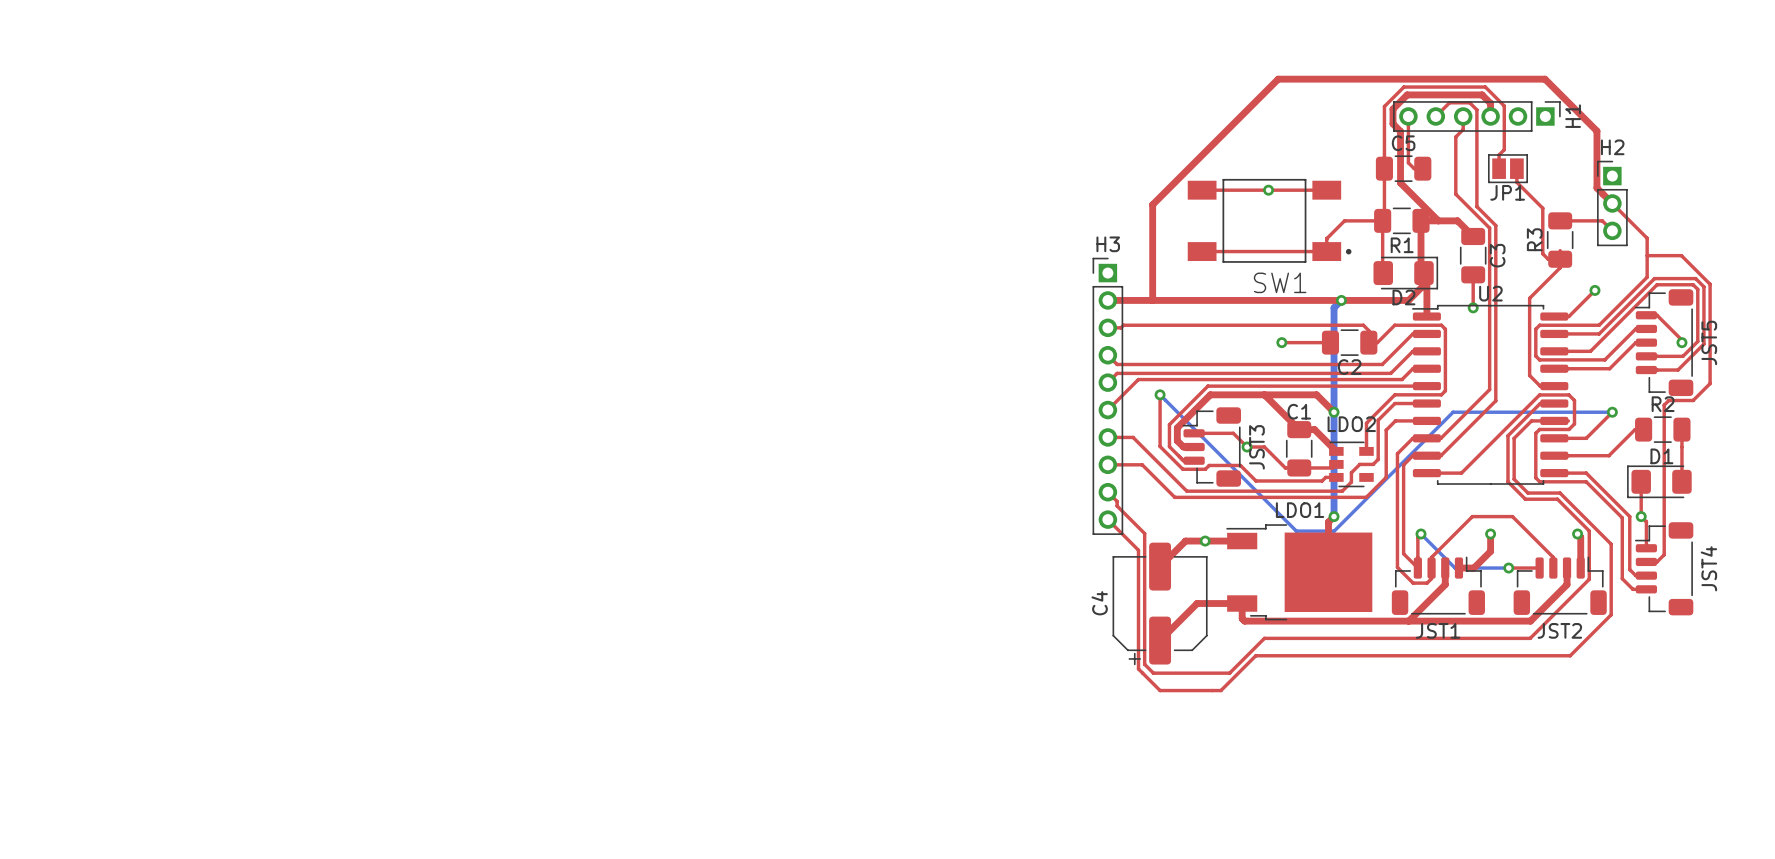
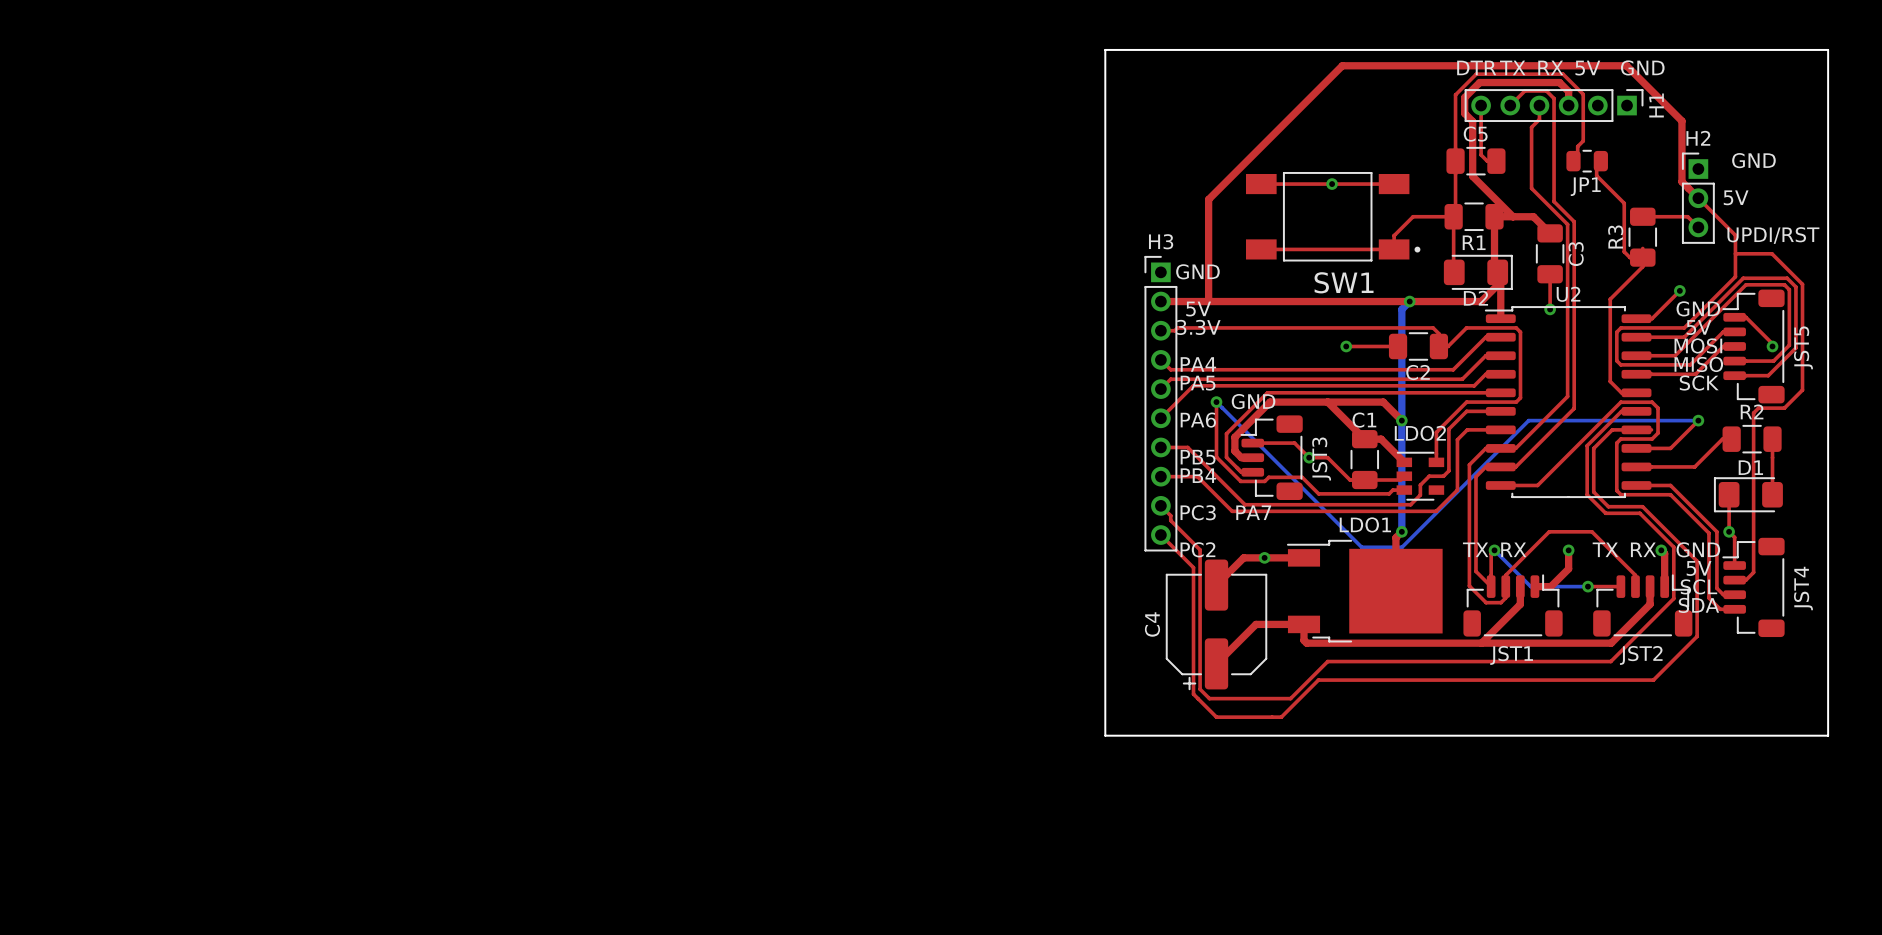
board edge: none -> (1105, 49) (1828, 49) (1828, 735) (1105, 735) (1105, 49)
text: none -> DTR (1476, 67)
text: none -> TX (1512, 67)
text: none -> RX (1550, 67)
text: none -> 5V (1587, 68)
text: none -> GND (1642, 67)
JP1 footprint: [1487, 154, 1528, 184] -> [1566, 149, 1608, 173]
text: none -> GND (1753, 160)
text: none -> 5V (1736, 197)
text: none -> UPDI/RST (1773, 235)
text: none -> GND (1197, 271)
text: none -> 5V (1198, 309)
text: none -> GND (1698, 308)
text: none -> 3.3V (1198, 327)
text: none -> 5V (1699, 327)
text: none -> MOSI (1698, 345)
text: none -> PA4 (1198, 364)
text: none -> MISO (1698, 364)
text: none -> PA5 (1198, 383)
text: none -> SCK (1699, 383)
text: none -> GND (1253, 401)
text: none -> PA6 (1198, 420)
text: none -> PB5 (1198, 457)
text: none -> PB4 (1198, 475)
text: none -> PC3 (1198, 512)
text: none -> PA7 (1253, 512)
text: none -> PC2 (1197, 549)
text: none -> TX (1475, 549)
text: none -> RX (1513, 549)
text: none -> TX (1605, 549)
text: none -> RX (1643, 549)
text: none -> GND (1698, 549)
text: none -> 5V (1699, 568)
text: none -> SCL (1698, 586)
text: none -> SDA (1698, 605)

